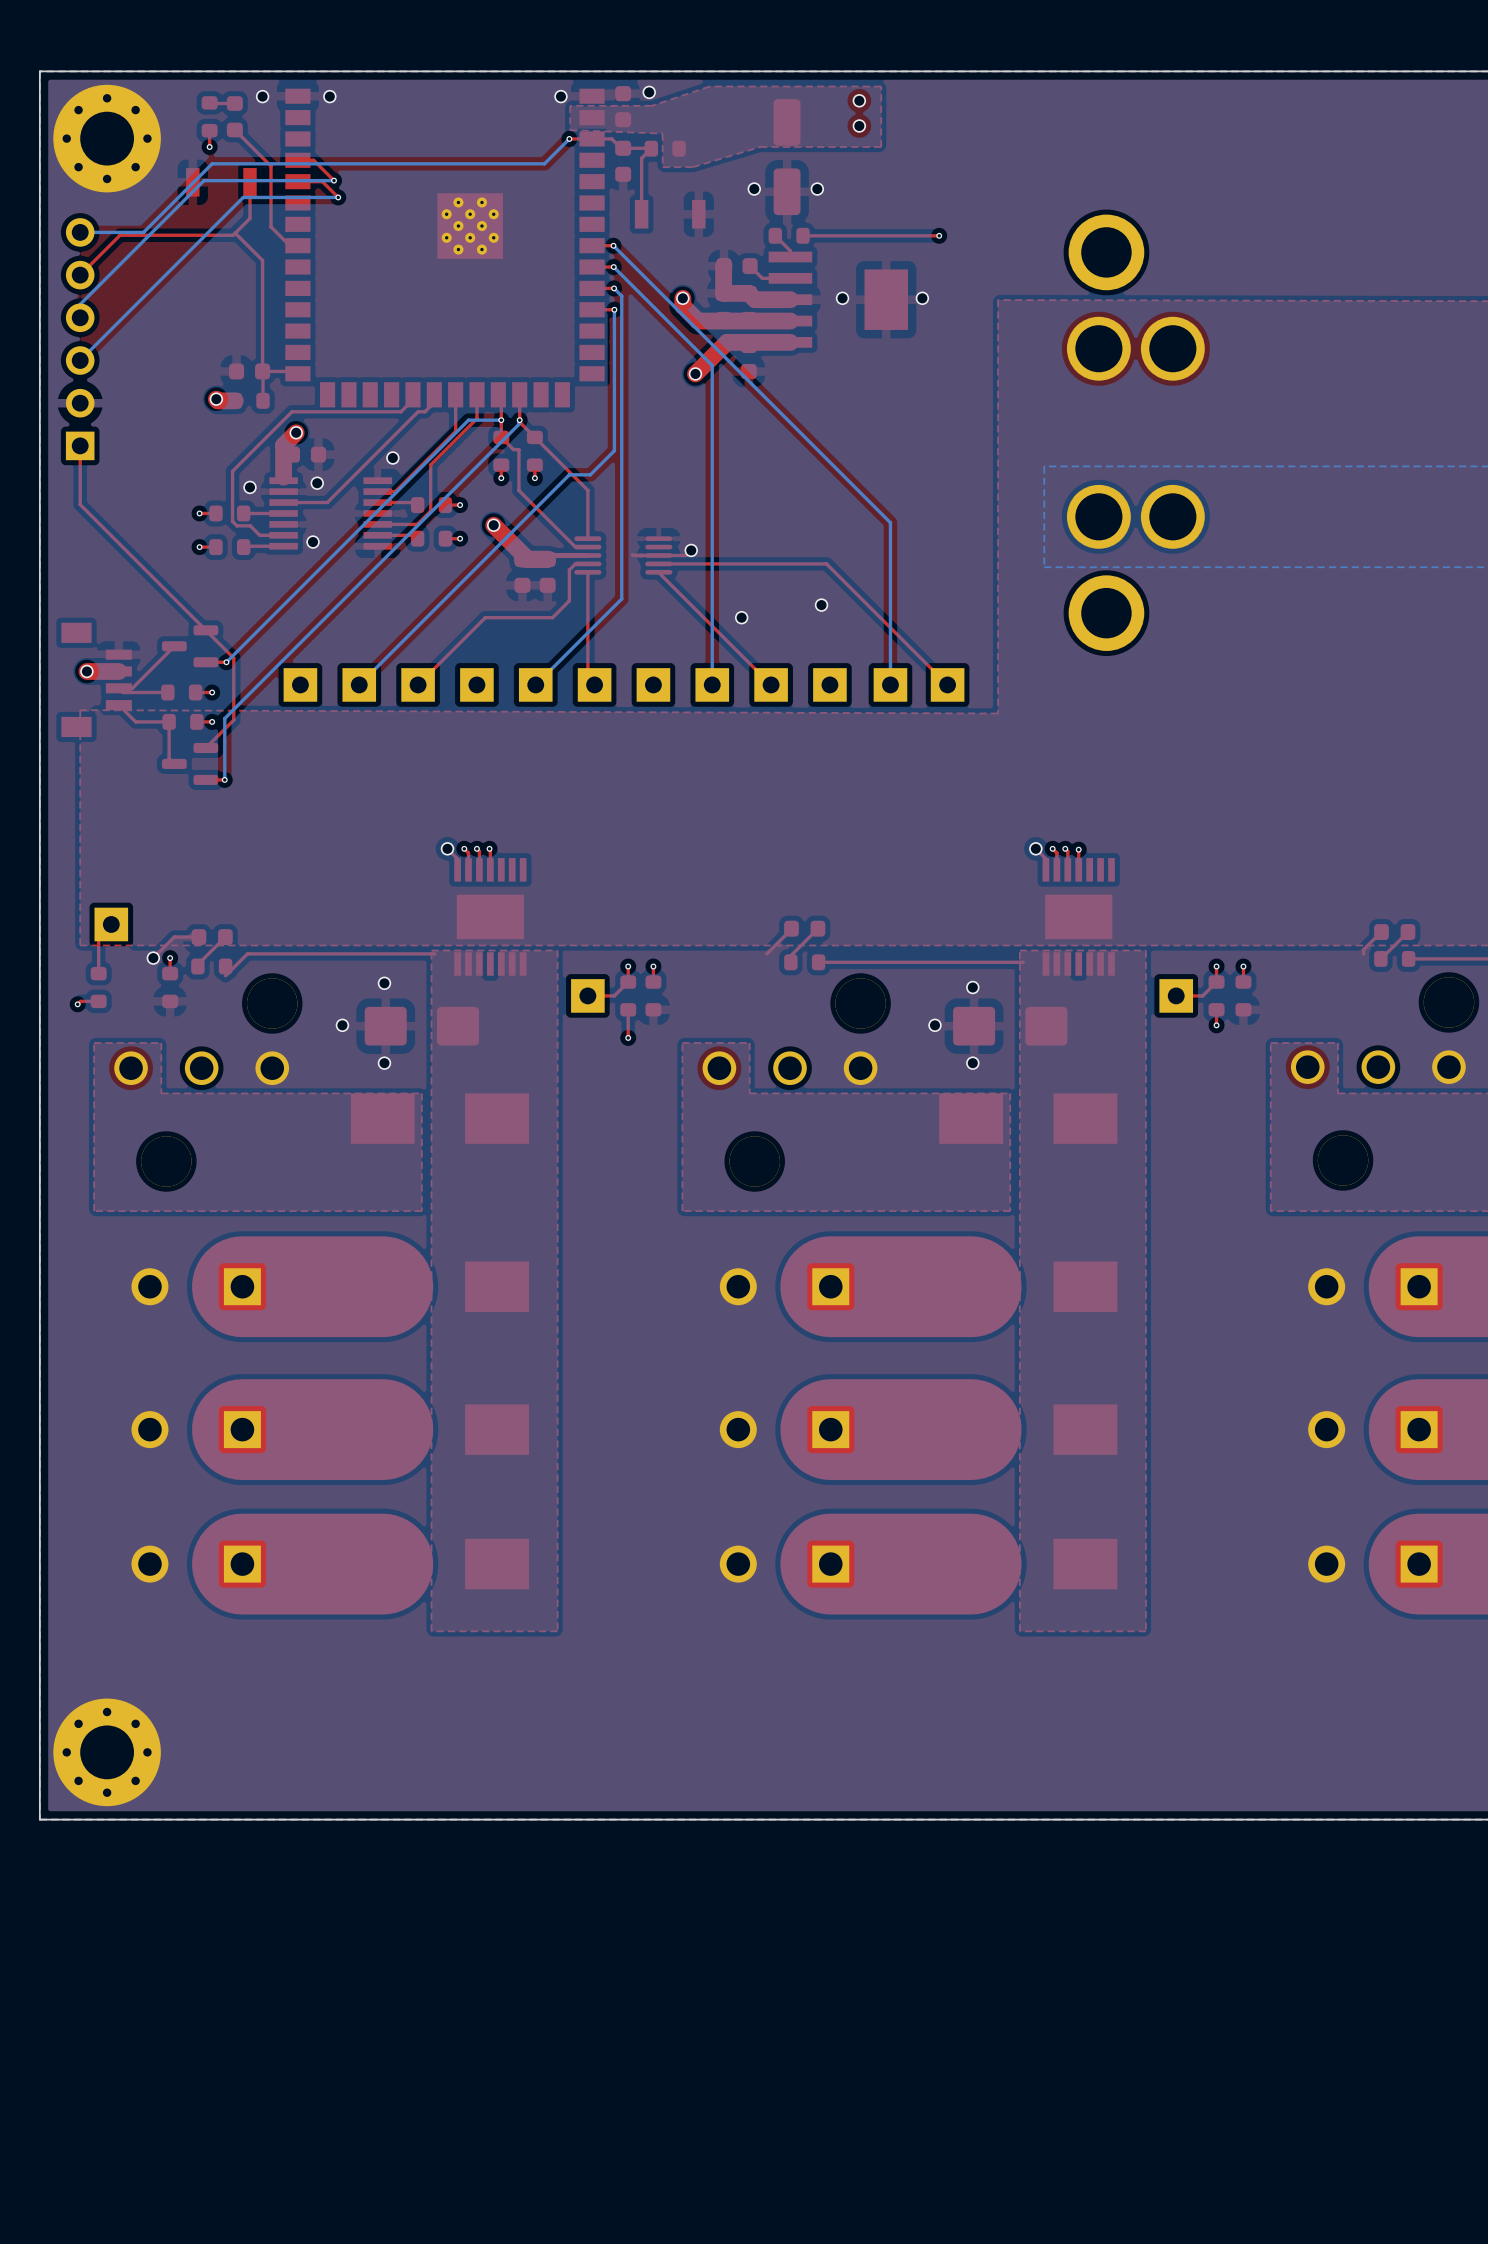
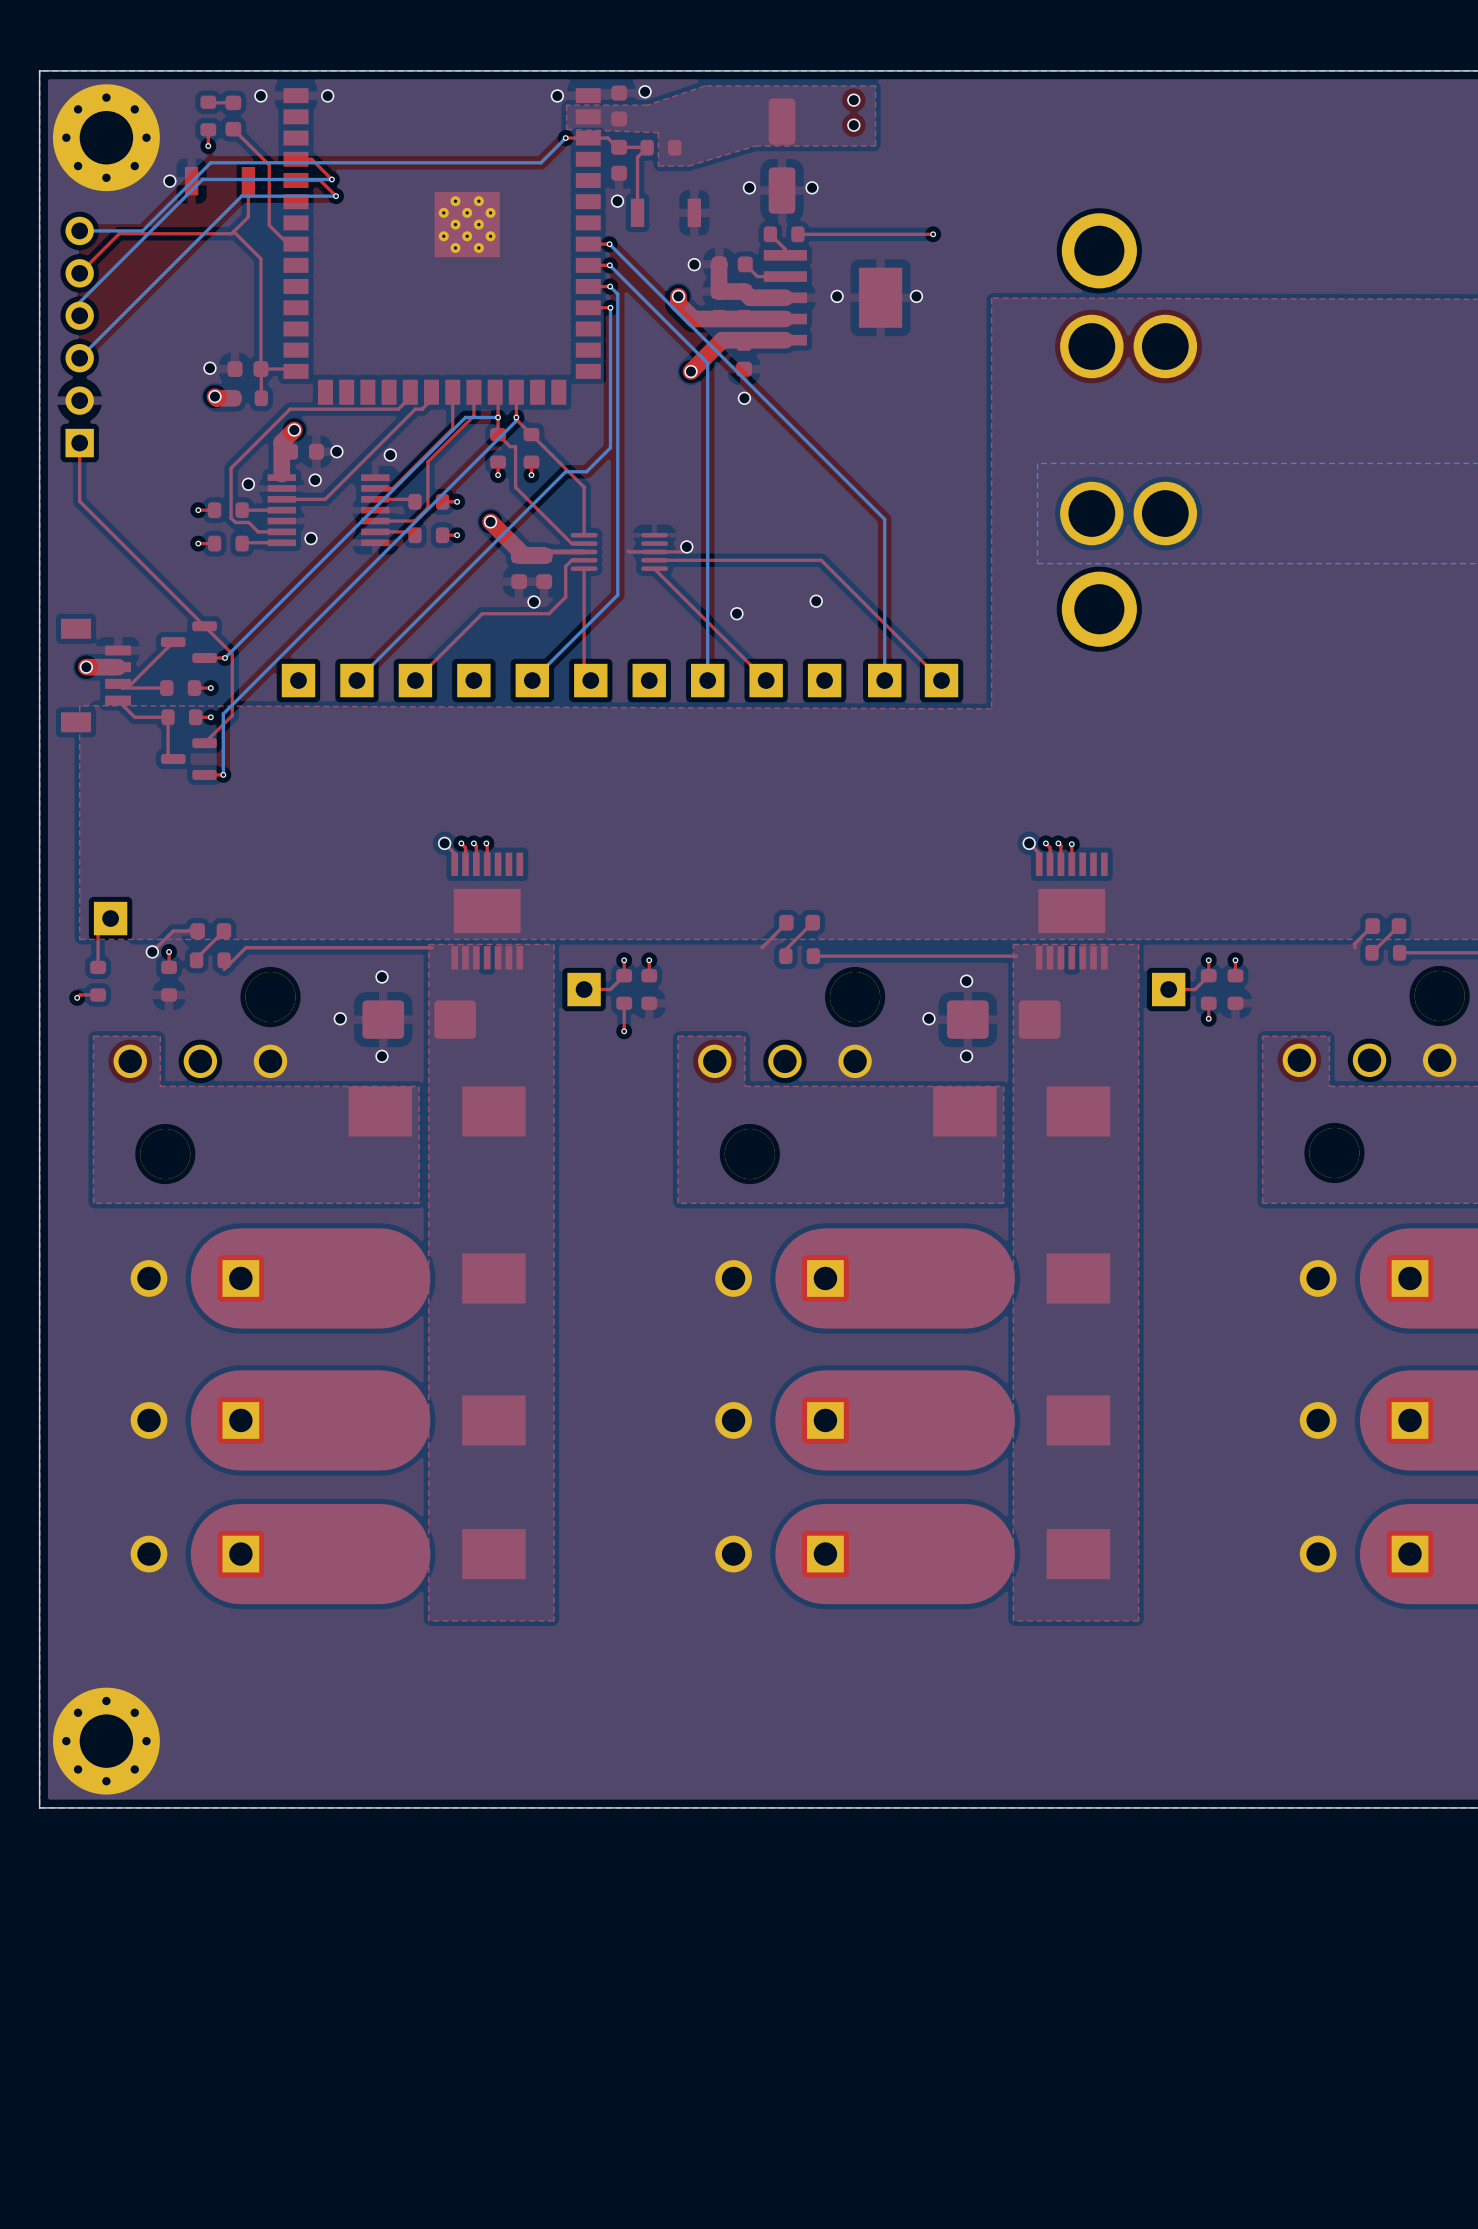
via: none -> (169, 181)
via: none -> (617, 201)
via: none -> (694, 264)
via: none -> (209, 368)
via: none -> (744, 398)
via: none -> (336, 451)
via: none -> (533, 602)

